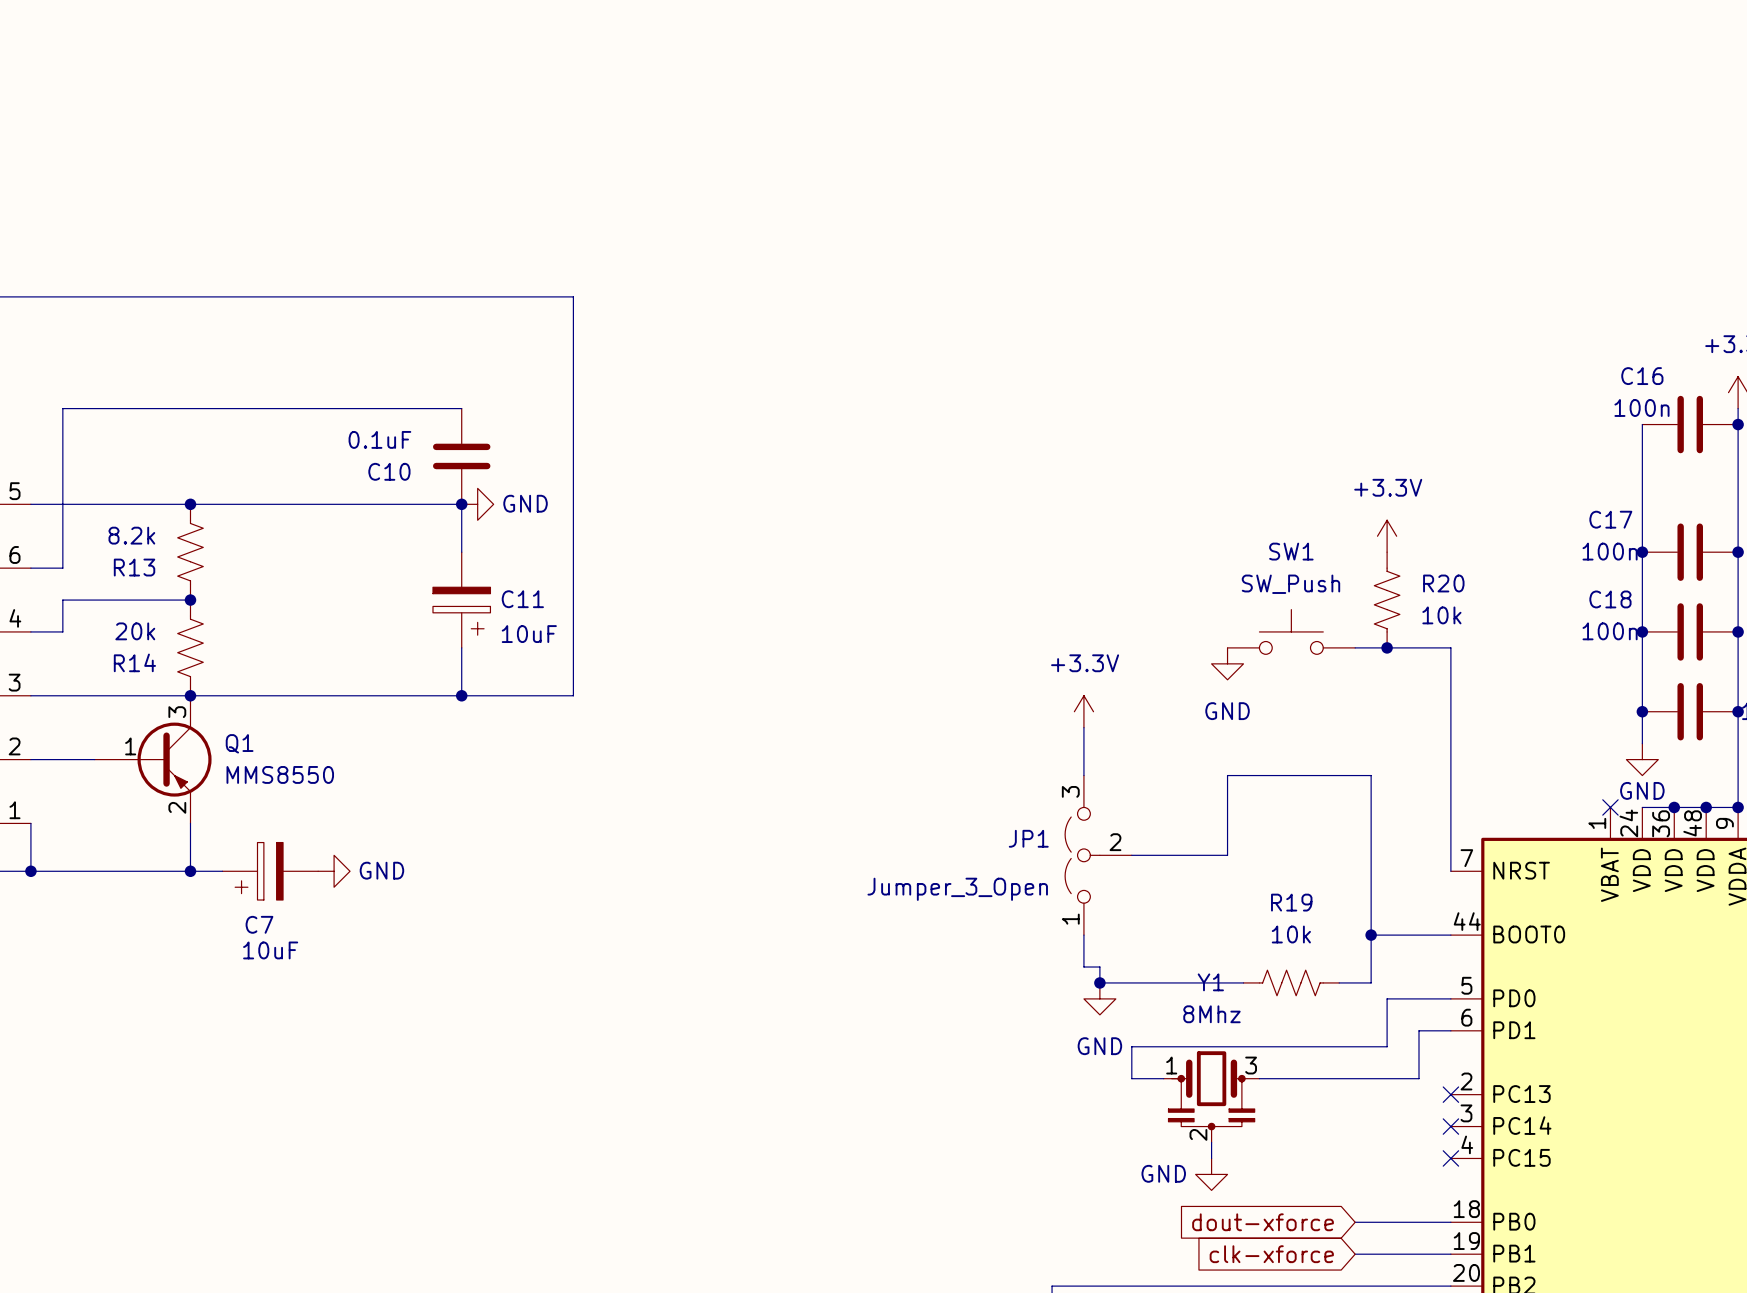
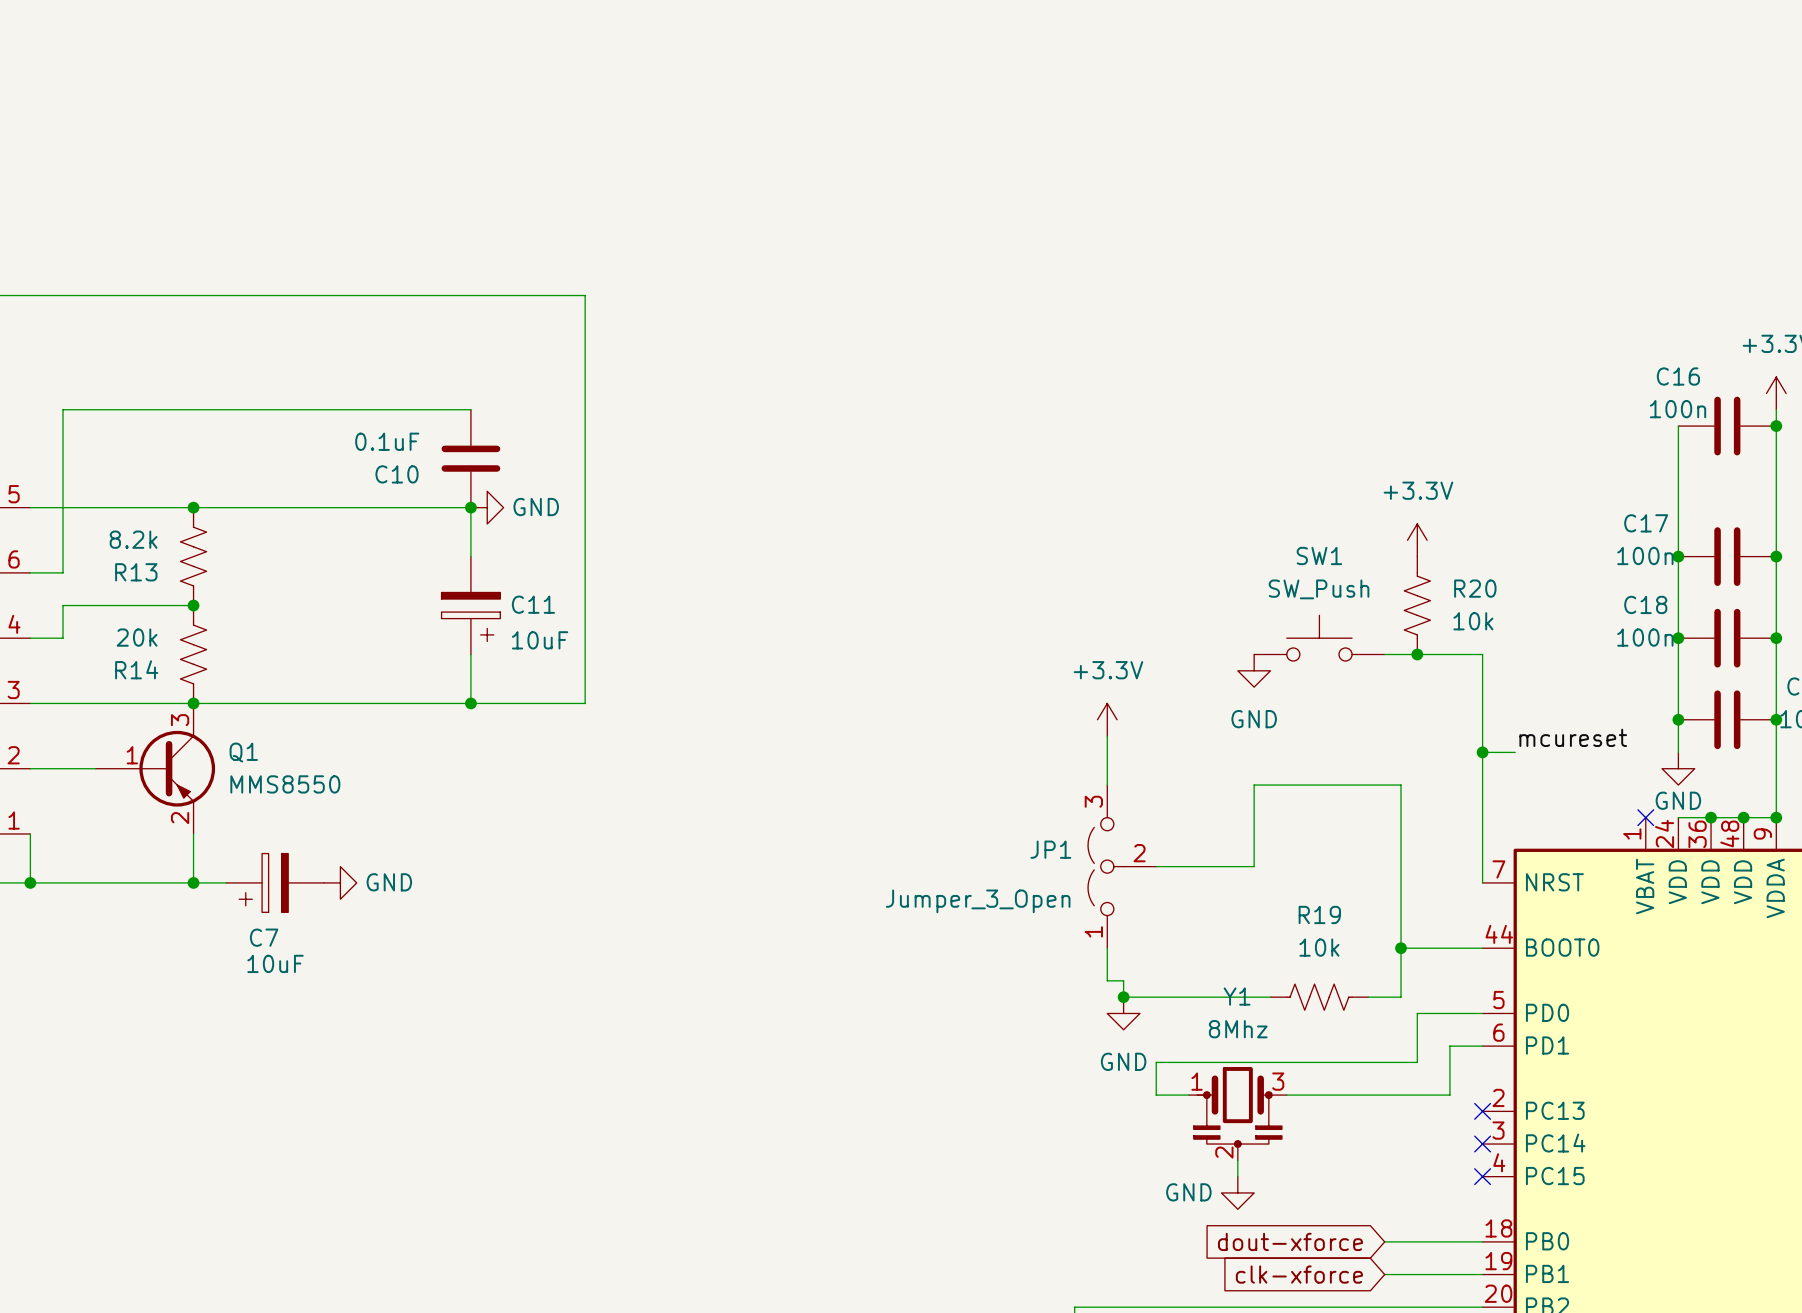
label: none -> mcureset (1573, 737)
wire: none -> (1482, 752) (1515, 752)
junction: none -> (1482, 752)

